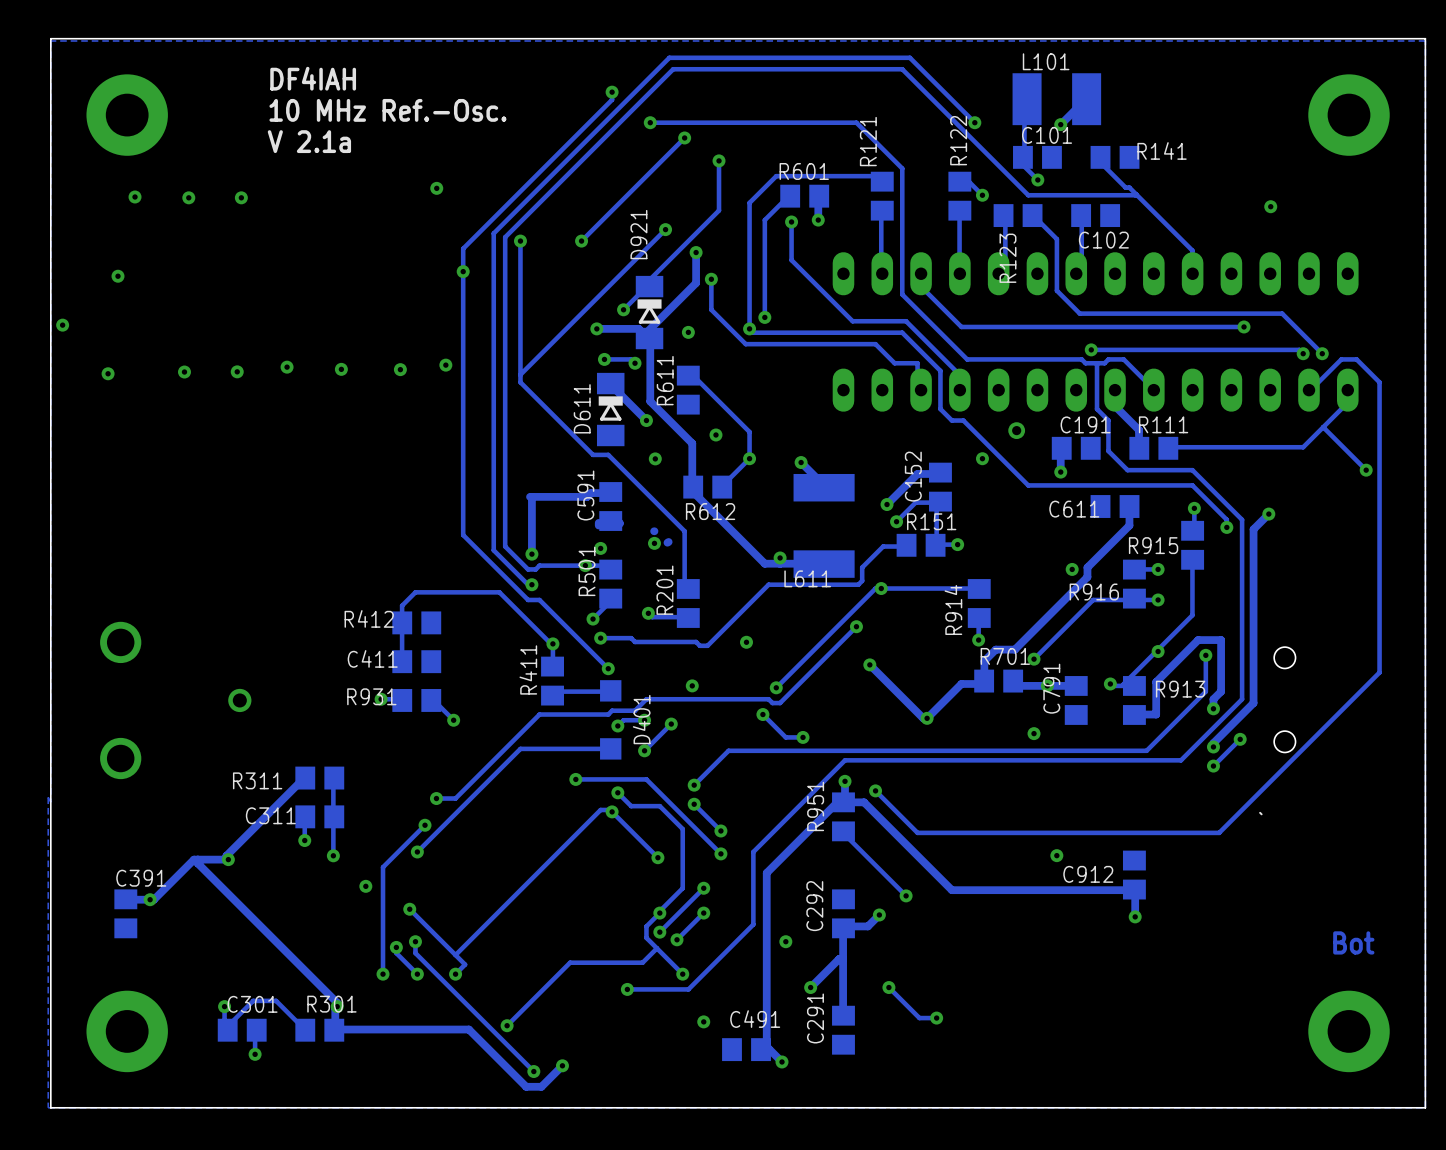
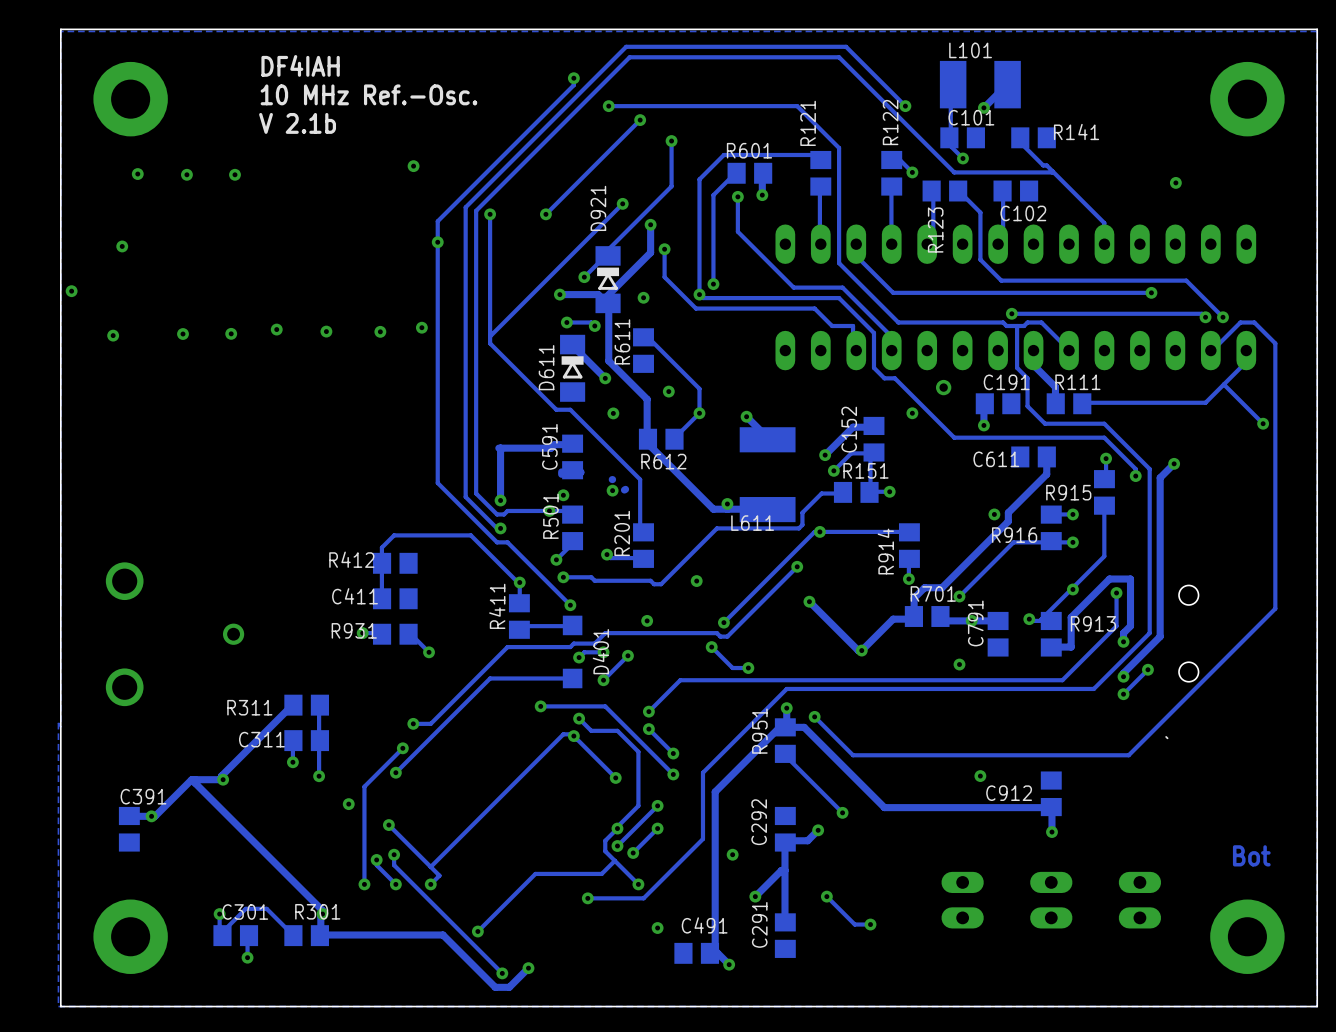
text: V 2.1a (309, 141) -> V 2.1b (297, 123)
part: none -> (962, 900)
part: none -> (1051, 900)
part: none -> (1139, 900)

